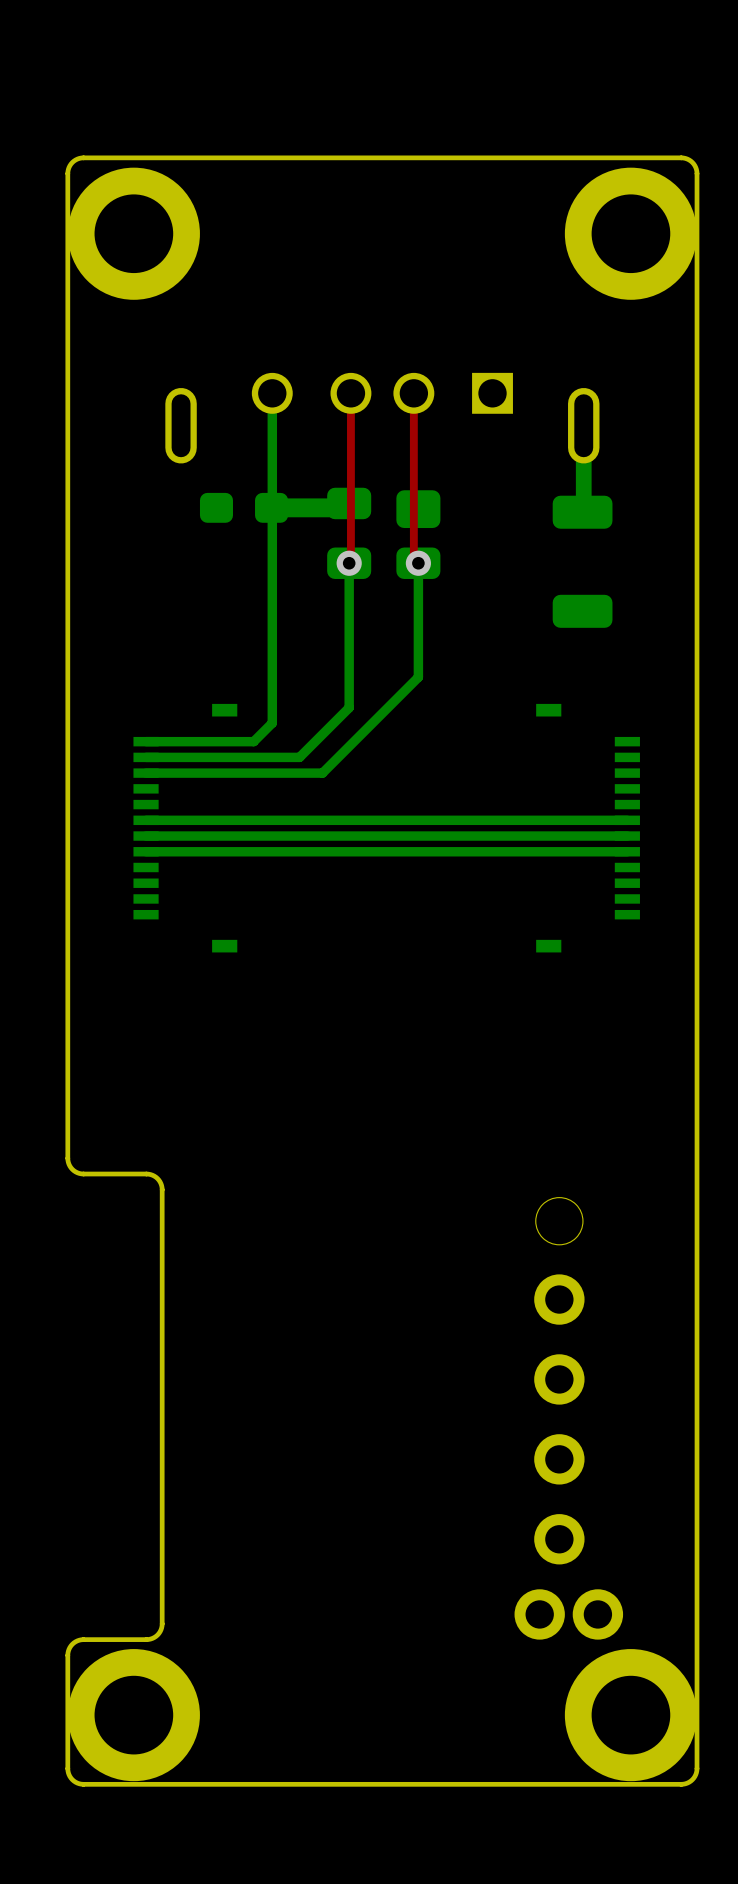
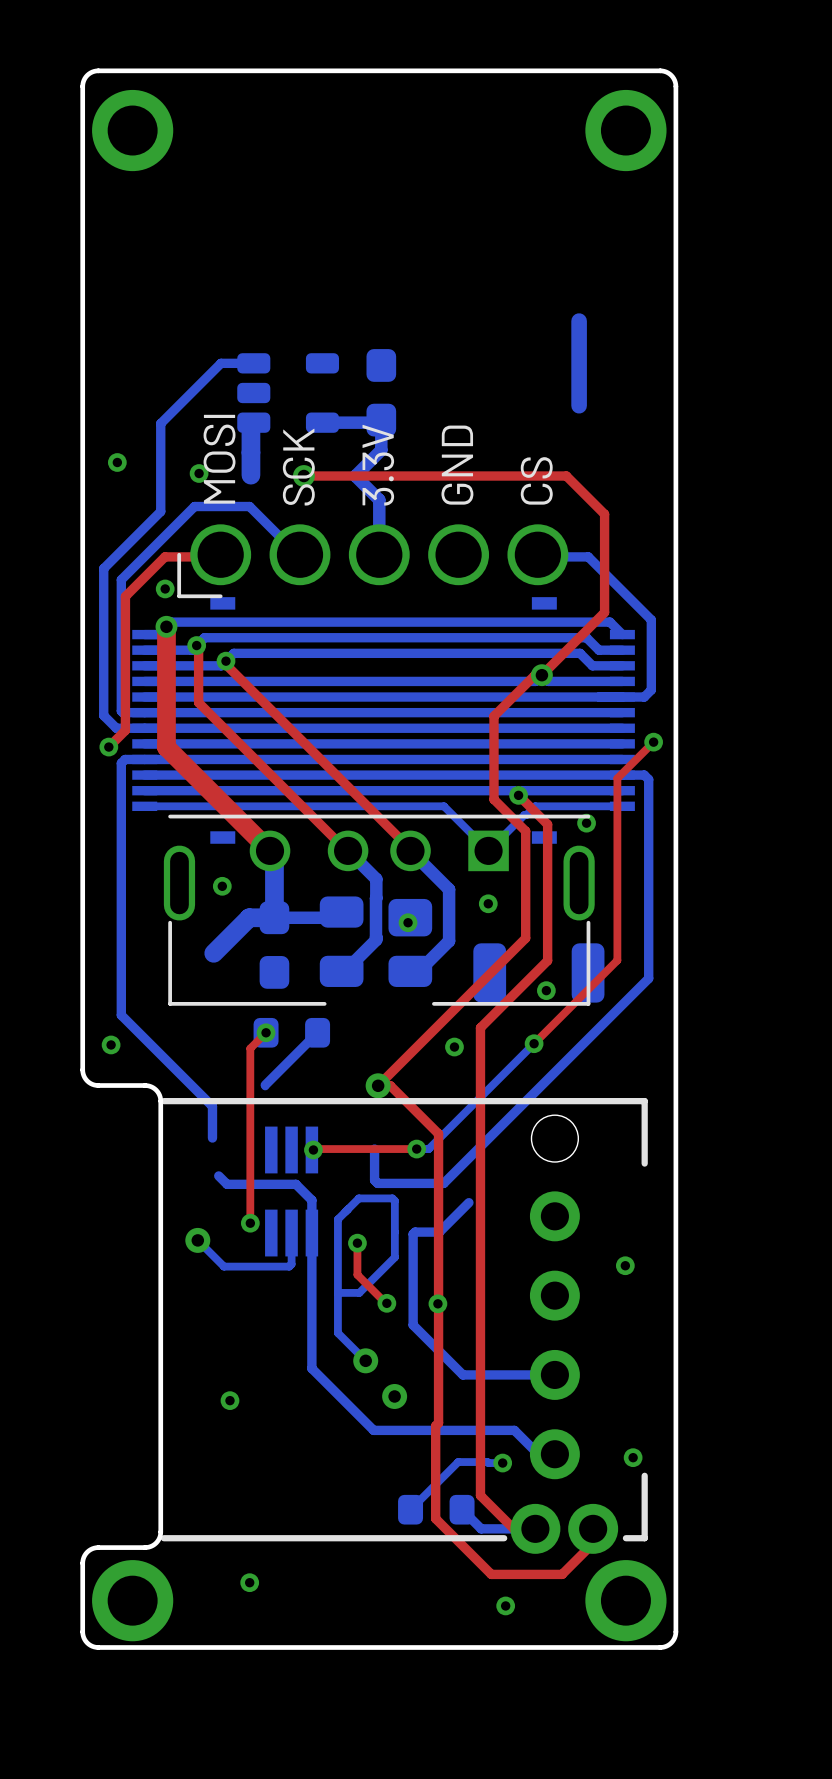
part footprint: [67, 167, 200, 300] -> [92, 89, 174, 172]
part footprint: [564, 167, 698, 300] -> [585, 89, 667, 172]
bottom track: (272, 393) (272, 723) (253, 741) (160, 741) -> (622, 634) (609, 622) (171, 622) (158, 634)
top track: (350, 393) (350, 561) (349, 563) -> none
top track: (413, 393) (413, 558) (418, 563) -> none
part: (382, 418) -> none
bottom track: none -> (252, 363) (221, 363) (160, 423) (160, 511) (103, 568) (103, 715) (116, 728) (144, 728)
part: none -> (288, 393)
part rotation: 0° (244, 507) -> 90° clockwise (381, 392)
part position: (244, 507) -> (381, 392)
bottom track: (271, 507) (344, 507) -> none
bottom track: none -> (381, 420) (381, 450) (355, 476) (379, 499) (379, 554)
bottom track: none -> (323, 422) (378, 422)
bottom track: none -> (250, 424) (250, 475)
part position: (383, 533) -> (375, 941)
part rotation: 0° (582, 561) -> 90° clockwise (538, 972)
part position: (582, 561) -> (538, 972)
bottom track: (349, 563) (349, 707) (299, 757) (193, 757) -> (622, 650) (599, 650) (586, 637) (204, 637) (192, 650)
via: (349, 563) -> none
bottom track: (418, 563) (418, 677) (322, 773) (223, 773) -> (622, 665) (592, 665) (580, 653) (233, 653) (221, 665)
via: (418, 563) -> none
via: none -> (117, 462)
via: none -> (199, 473)
top track: none -> (303, 476) (566, 476) (604, 514) (604, 612) (541, 675)
via: none -> (303, 476)
top track: none -> (220, 556) (164, 556) (125, 596) (125, 730) (108, 747)
bottom track: none -> (299, 556) (249, 506) (194, 506) (121, 579) (121, 711) (144, 712)
bottom track: none -> (537, 556) (588, 556) (651, 619) (651, 689) (644, 697) (144, 697)
part: none -> (372, 561)
via: none -> (165, 588)
top track: none -> (166, 626) (166, 747) (270, 850)
via: none -> (166, 626)
top track: none -> (196, 645) (198, 647) (198, 702) (346, 850)
via: none -> (196, 645)
top track: none -> (226, 661) (226, 664) (410, 849)
via: none -> (226, 661)
top track: none -> (535, 675) (494, 716) (494, 799) (525, 831) (525, 938) (378, 1085) (390, 1085) (438, 1133) (438, 1423) (435, 1425) (435, 1518) (491, 1574) (562, 1574) (593, 1543)
via: none -> (541, 675)
bottom track: none -> (144, 681) (535, 681) (541, 675) (548, 681) (622, 681)
top track: none -> (653, 742) (617, 778) (617, 960) (534, 1043)
via: none -> (653, 742)
via: none -> (108, 747)
bottom track: none -> (622, 759) (125, 759) (121, 763) (121, 1015) (212, 1106) (212, 1138)
bottom track: none -> (144, 775) (644, 775) (648, 779) (648, 978) (443, 1183) (377, 1183) (374, 1180) (374, 1149)
bottom track: none -> (144, 790) (513, 790) (518, 795) (523, 790) (622, 790)
top track: none -> (518, 795) (547, 824) (547, 960) (480, 1027) (480, 1495) (513, 1528) (535, 1528)
via: none -> (518, 795)
bottom track: none -> (144, 806) (443, 806) (488, 850) (535, 806) (622, 806)
via: none -> (586, 823)
bottom track: none -> (348, 850) (376, 879) (376, 897)
bottom track: none -> (274, 855) (274, 917)
bottom track: none -> (420, 861) (449, 889) (449, 941) (418, 971) (407, 971)
via: none -> (222, 886)
bottom track: none -> (375, 898) (375, 937)
via: none -> (488, 903)
part: none -> (379, 910)
bottom track: none -> (344, 912) (339, 917) (249, 917) (213, 953)
via: none -> (408, 922)
bottom track: none -> (376, 937) (376, 939) (344, 971)
part: none -> (274, 945)
via: none -> (546, 990)
top track: none -> (266, 1032) (250, 1048) (250, 1223)
via: none -> (266, 1032)
part: none -> (291, 1032)
bottom track: none -> (317, 1032) (265, 1086)
bottom track: none -> (534, 1043) (428, 1149) (416, 1149)
via: none -> (534, 1043)
via: none -> (111, 1044)
via: none -> (454, 1047)
via: none -> (378, 1085)
board edge: (162, 1211) (161, 1185) (154, 1176) (146, 1174) (81, 1173) (72, 1169) (67, 1160) (67, 173) (69, 165) (75, 159) (83, 157) (681, 157) (689, 159) (694, 165) (697, 173) (695, 1774) (689, 1782) (681, 1784) (83, 1784) (75, 1782) (69, 1776) (67, 1768) (67, 1655) (69, 1647) (75, 1641) (81, 1639) (150, 1639) (158, 1633) (162, 1623) -> (160, 1101) (158, 1093) (151, 1086) (94, 1084) (85, 1079) (82, 1071) (83, 80) (90, 72) (98, 70) (666, 72) (673, 78) (675, 86) (674, 1637) (669, 1644) (660, 1647) (98, 1647) (90, 1645) (84, 1639) (82, 1631) (82, 1563) (84, 1555) (88, 1550) (96, 1547) (145, 1547) (152, 1545) (160, 1536) (160, 1510)
top track: none -> (416, 1149) (313, 1149)
via: none -> (416, 1149)
via: none -> (313, 1149)
bottom track: none -> (218, 1175) (227, 1184) (295, 1184) (311, 1200) (311, 1368) (373, 1430) (514, 1430) (538, 1454)
part: none -> (291, 1191)
bottom track: none -> (468, 1202) (439, 1232) (415, 1232) (413, 1234) (413, 1325) (462, 1374) (554, 1374)
via: none -> (250, 1223)
bottom track: none -> (291, 1233) (291, 1264) (289, 1266) (224, 1266) (197, 1240)
via: none -> (197, 1240)
top track: none -> (357, 1243) (357, 1274) (386, 1303)
via: none -> (357, 1243)
via: none -> (625, 1265)
bottom track: none -> (337, 1292) (359, 1292) (394, 1257) (394, 1200) (392, 1198) (358, 1198) (337, 1219) (337, 1333) (365, 1360)
via: none -> (386, 1303)
via: none -> (437, 1303)
part: (568, 1418) -> none
part: none -> (404, 1325)
via: none -> (365, 1360)
via: none -> (394, 1396)
via: none -> (229, 1400)
via: none -> (633, 1457)
bottom track: none -> (502, 1463) (458, 1462) (410, 1509)
via: none -> (502, 1463)
part: none -> (436, 1509)
bottom track: none -> (462, 1509) (481, 1528) (535, 1528)
part footprint: [67, 1649, 200, 1782] -> [92, 1560, 174, 1642]
part footprint: [564, 1649, 698, 1782] -> [585, 1560, 667, 1642]
via: none -> (249, 1582)
via: none -> (505, 1605)

